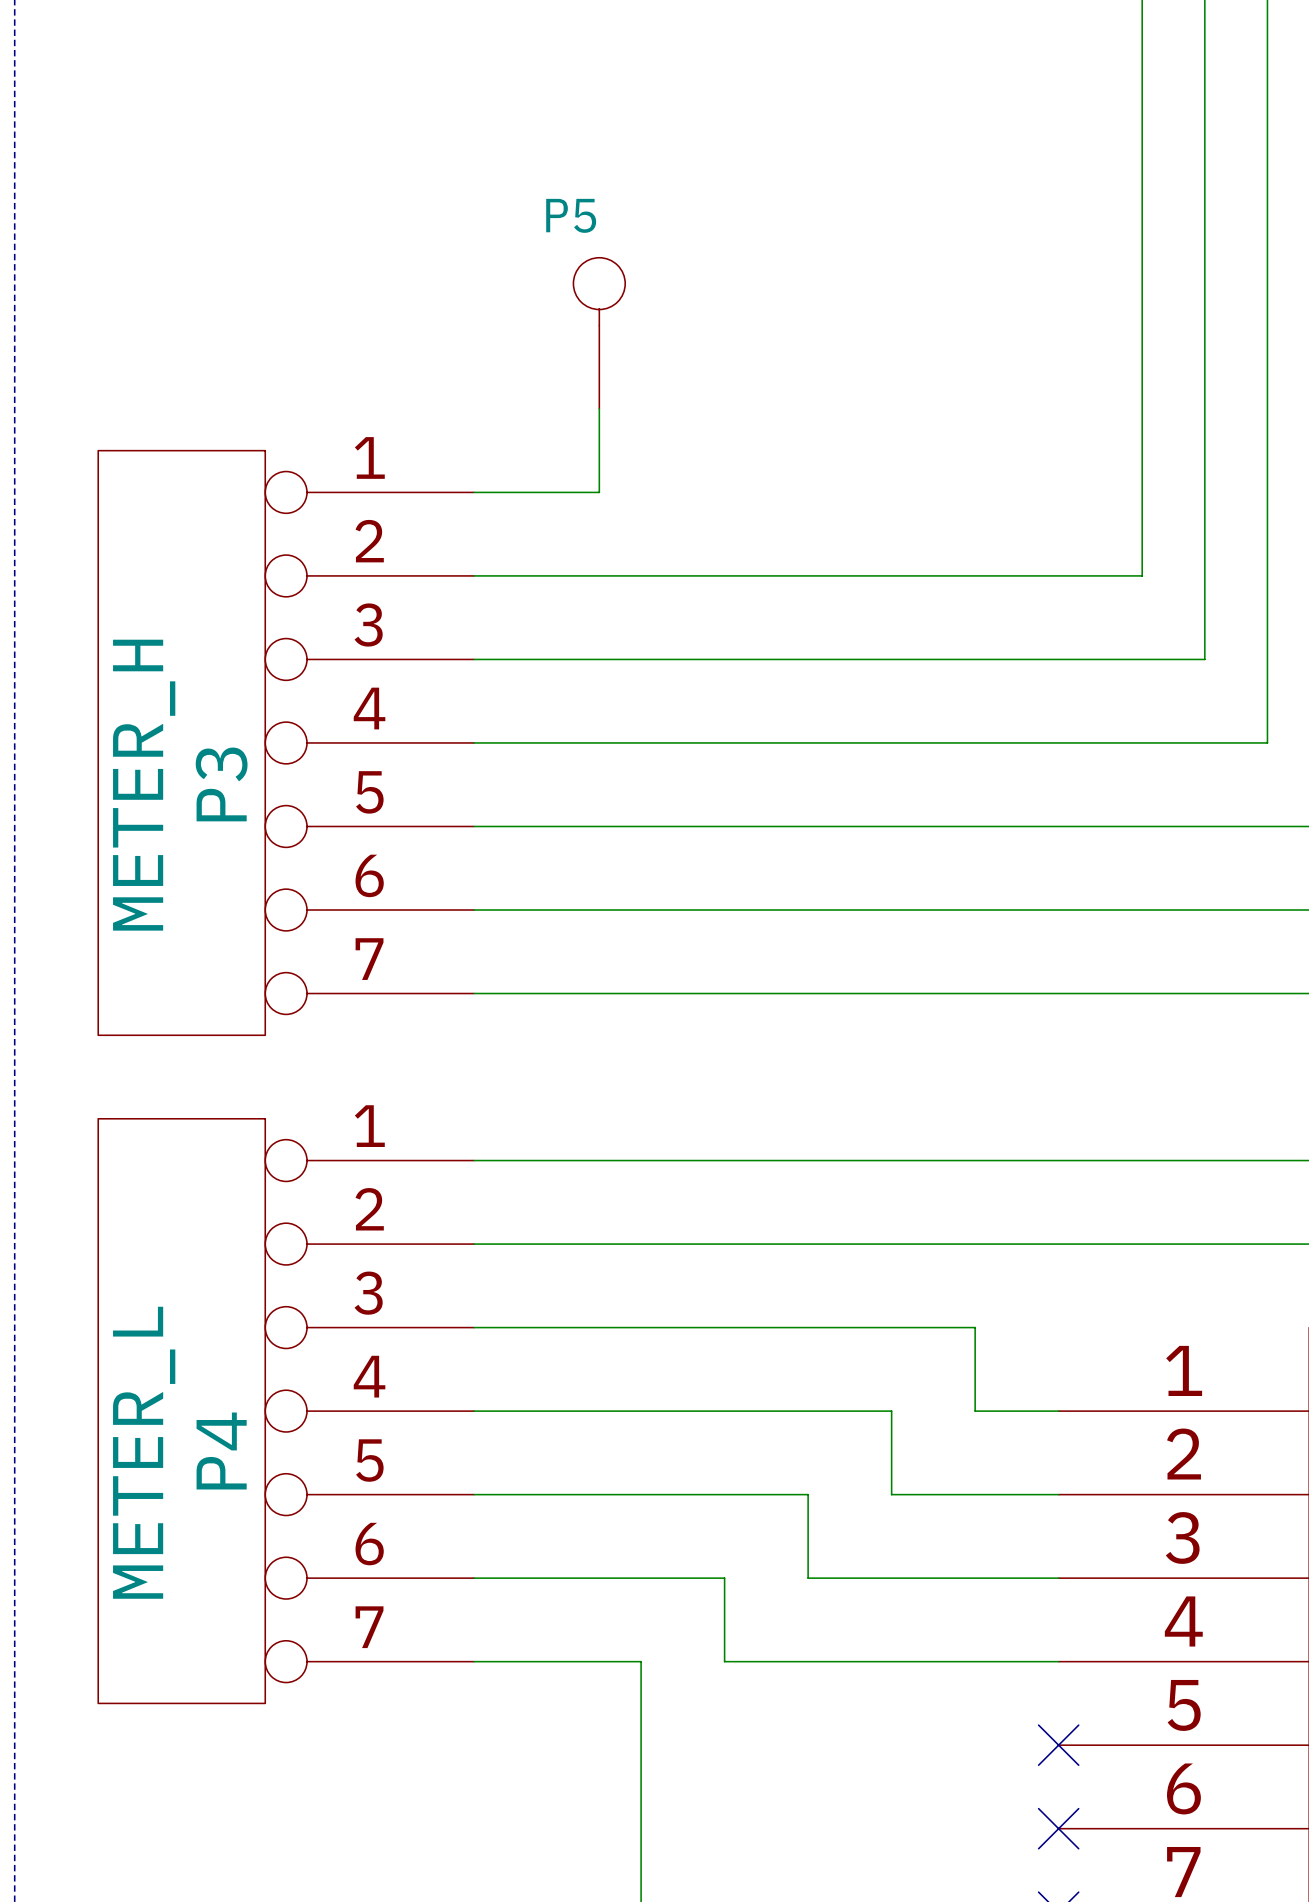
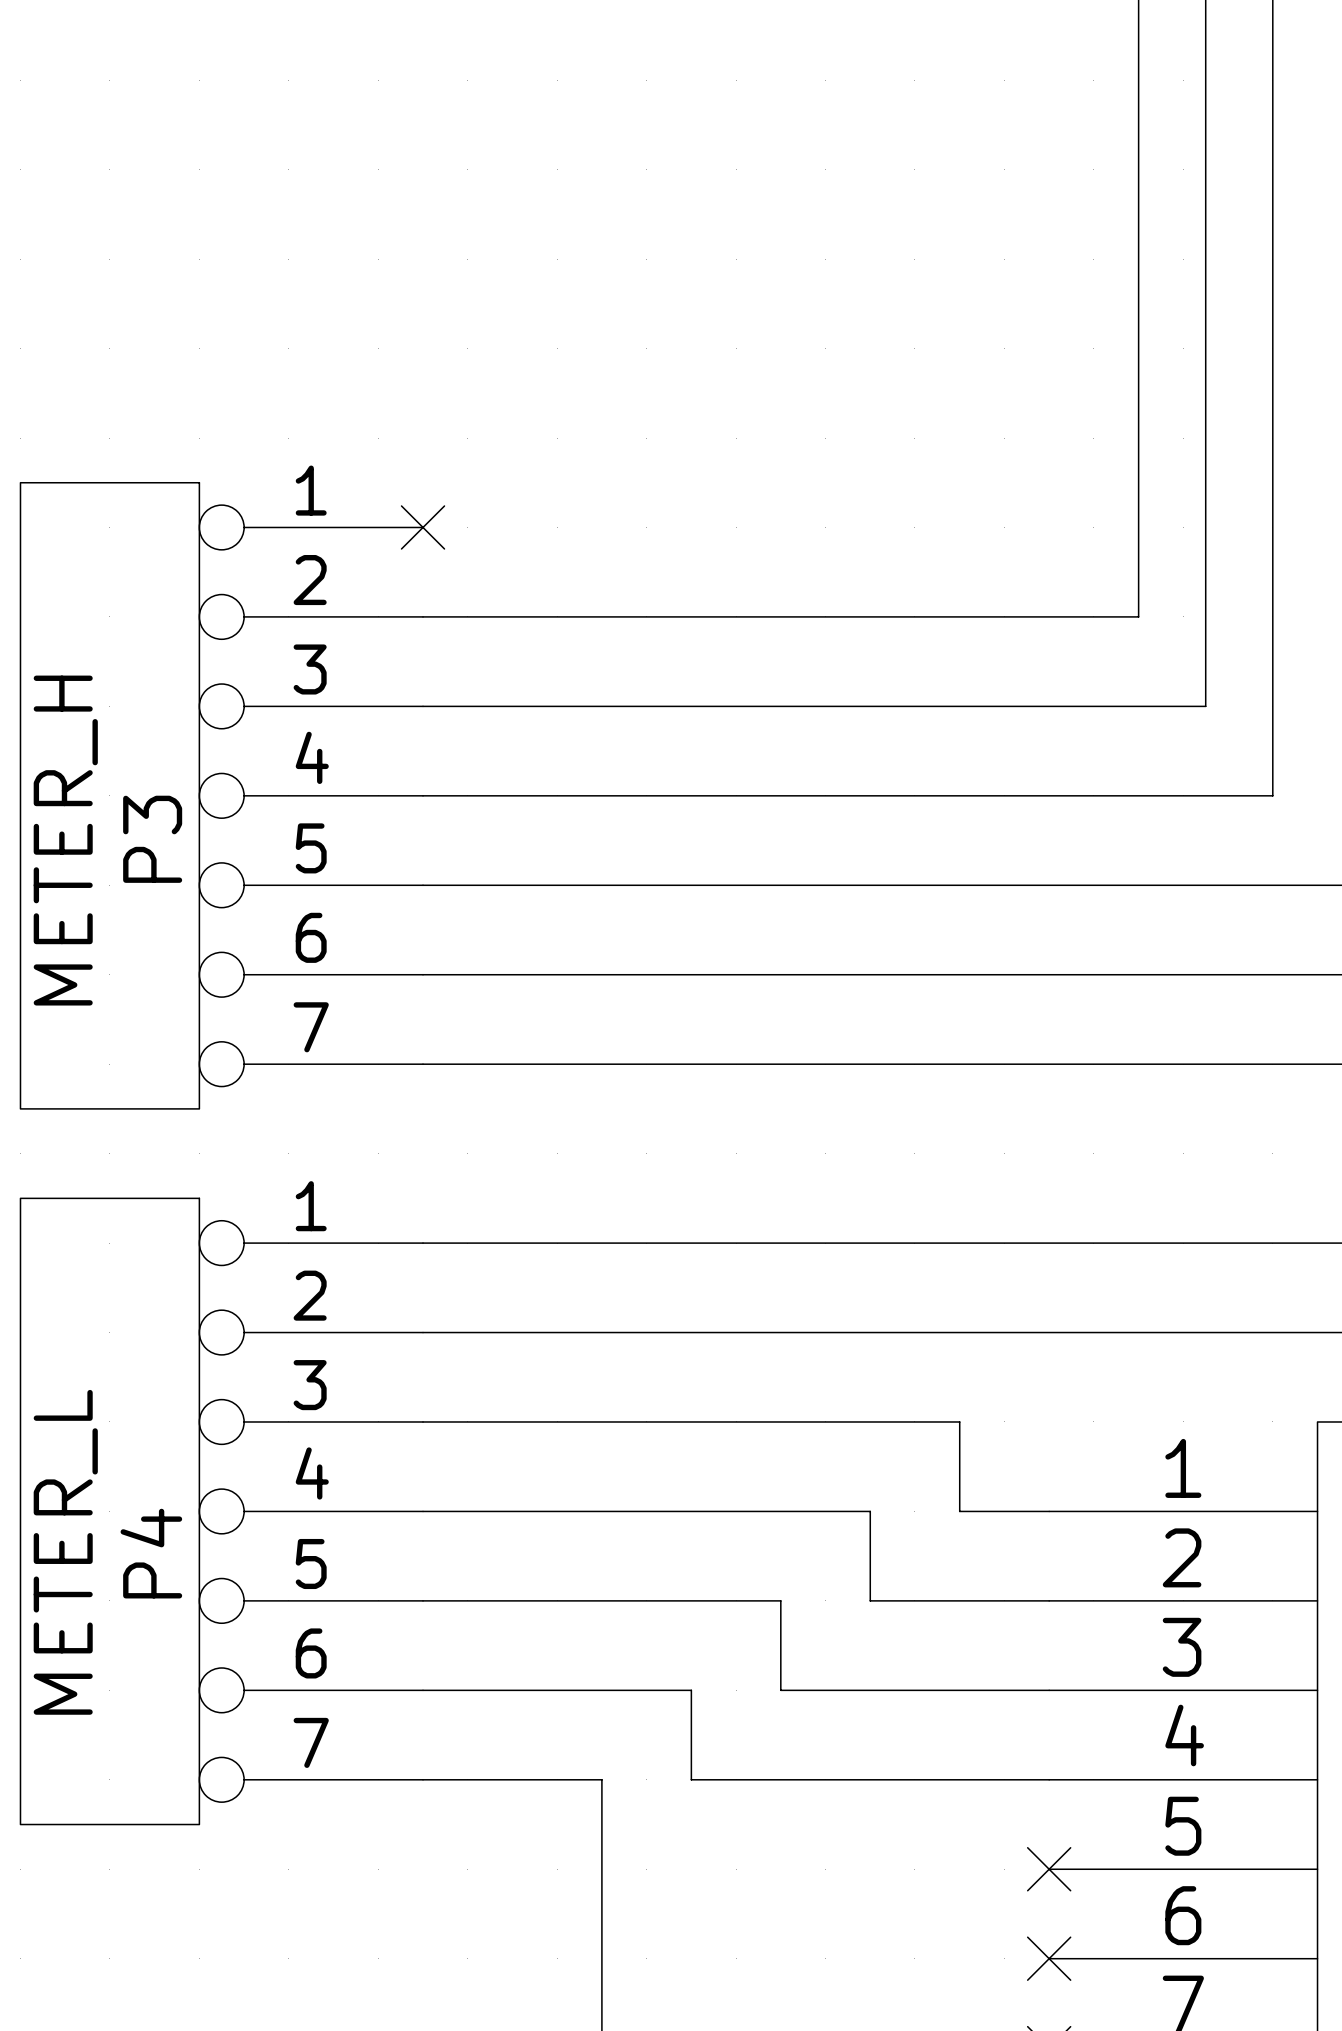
P5: (599, 333) -> none
wire: (599, 408) (599, 492) (474, 492) -> none
no-connect mark: none -> (423, 527)

